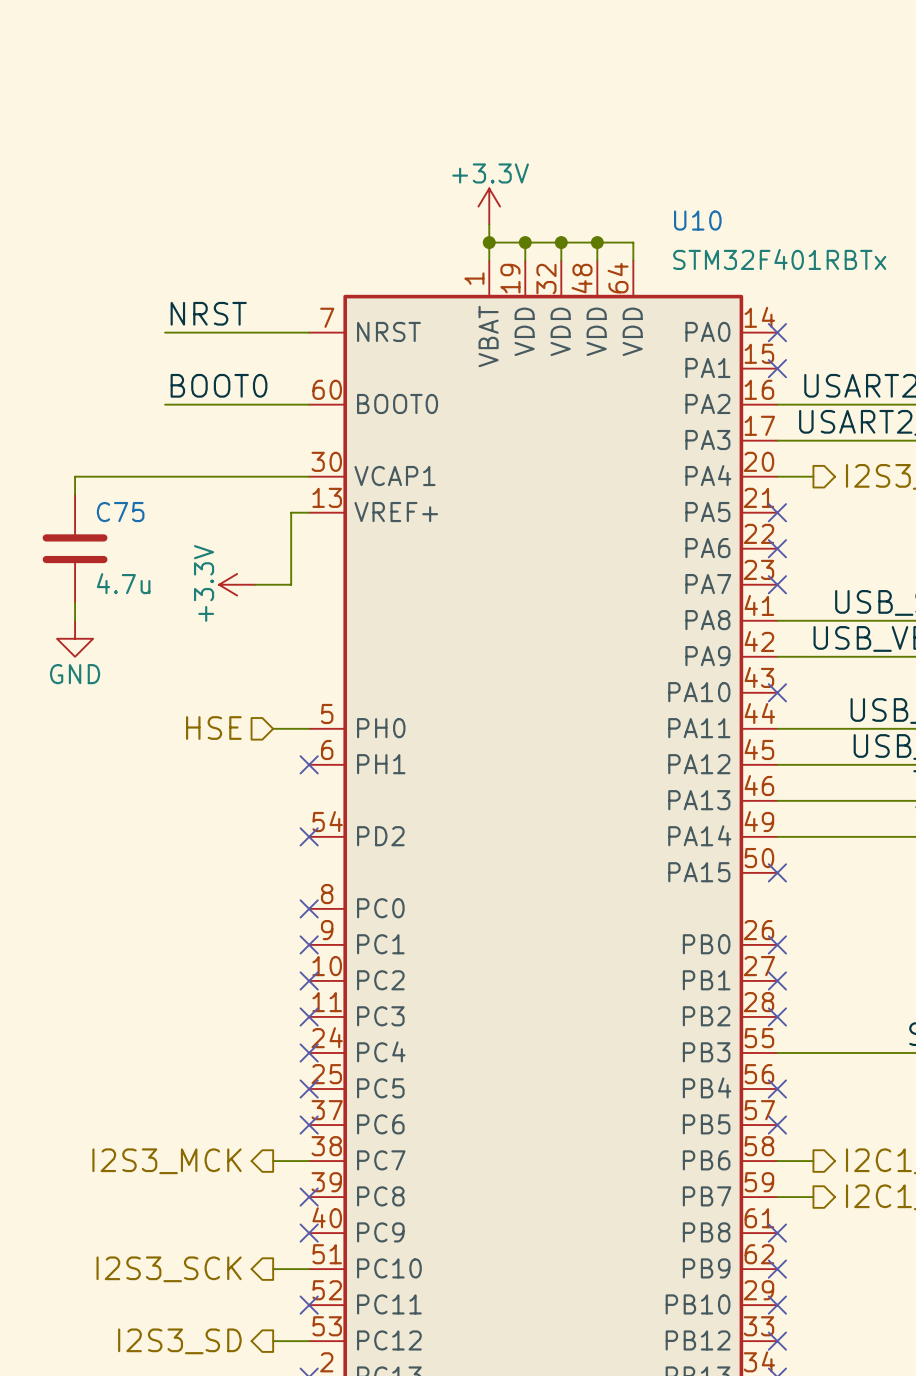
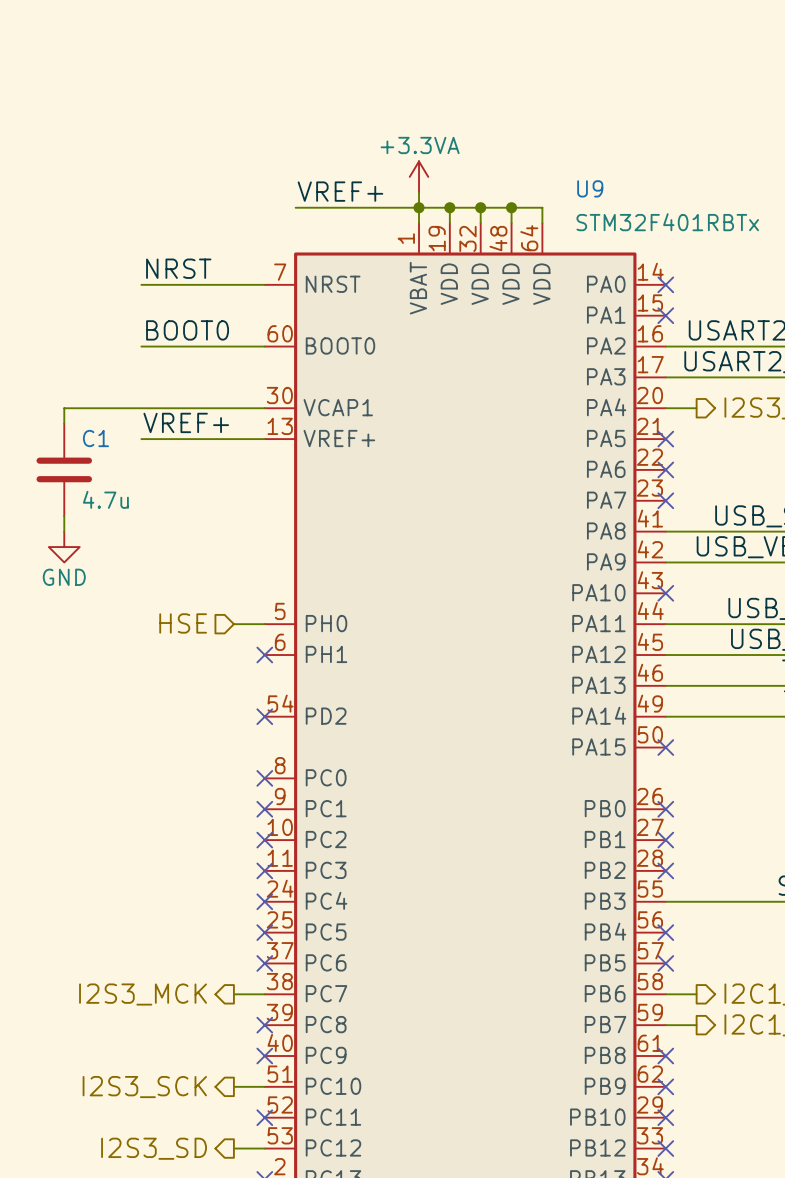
power symbol: +3.3V (489, 206) -> +3.3VA (419, 176)
U10 name: U10 (697, 220) -> U9 (590, 188)
label: none -> VREF+ (340, 191)
wire: none -> (295, 207) (419, 207)
label: none -> VREF+ (186, 422)
C75 name: C75 (120, 512) -> C1 (95, 438)
wire: (291, 512) (291, 584) (255, 584) -> (249, 439) (141, 439)
power symbol: +3.3V (237, 584) -> none

